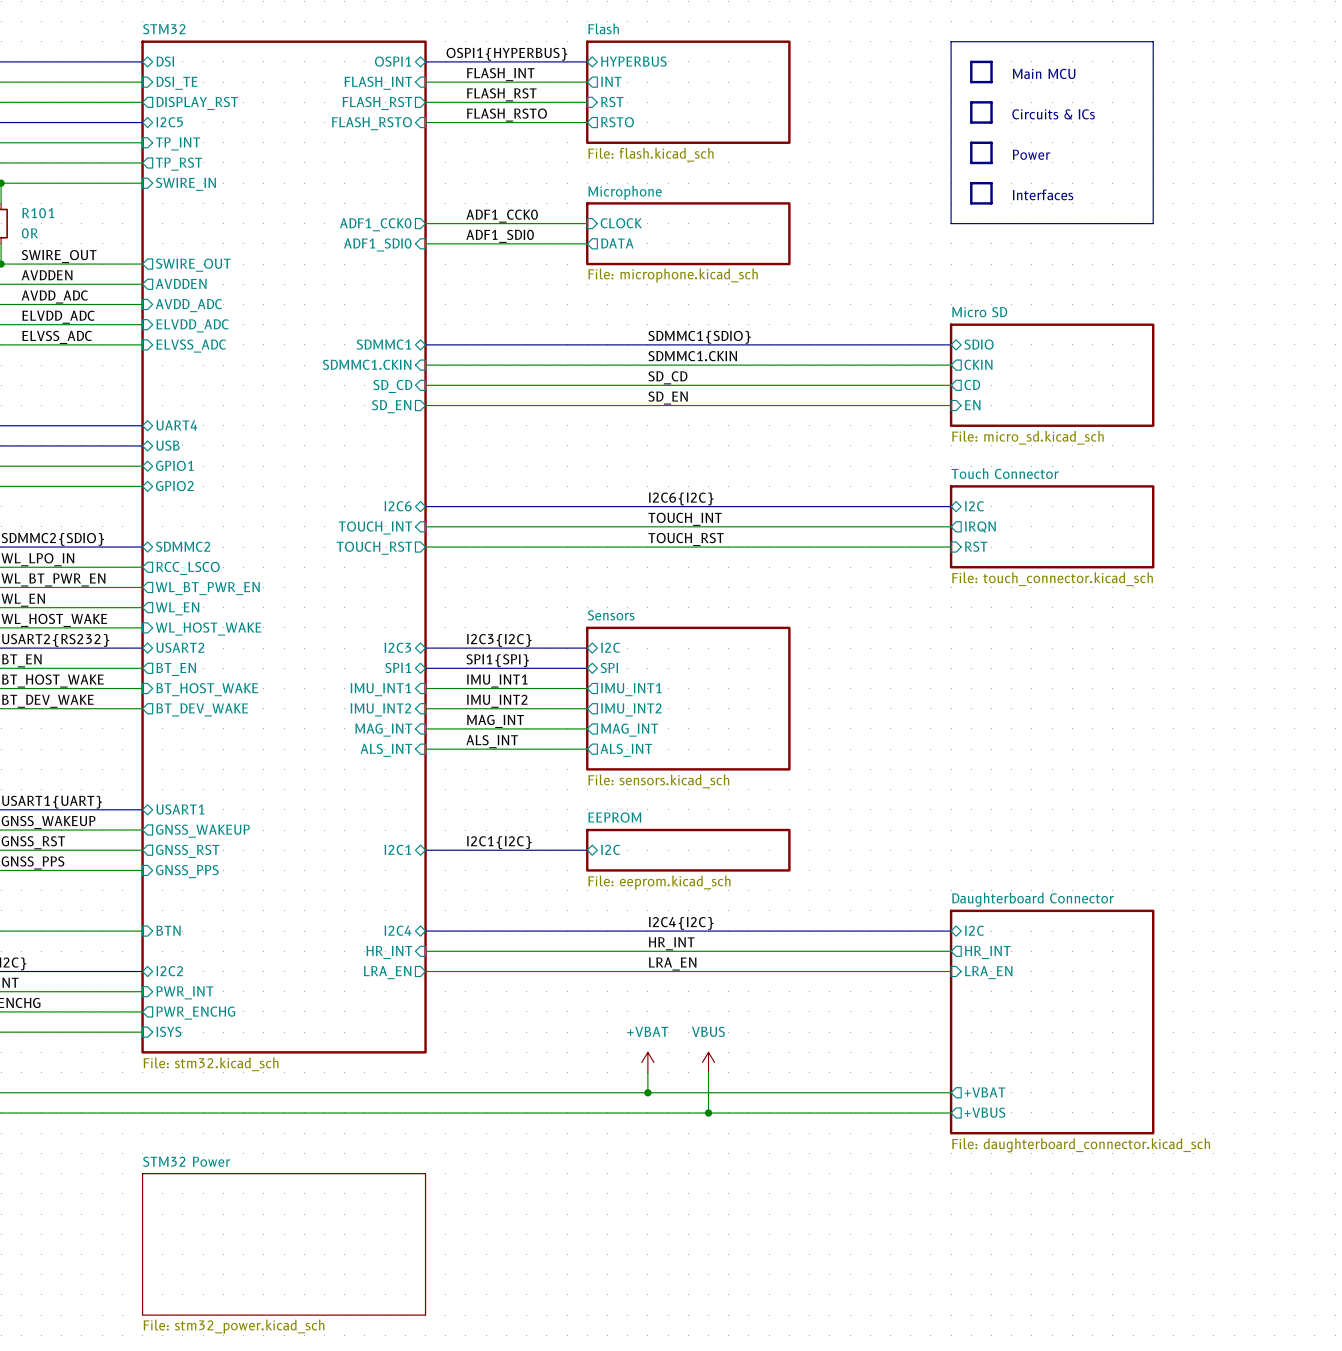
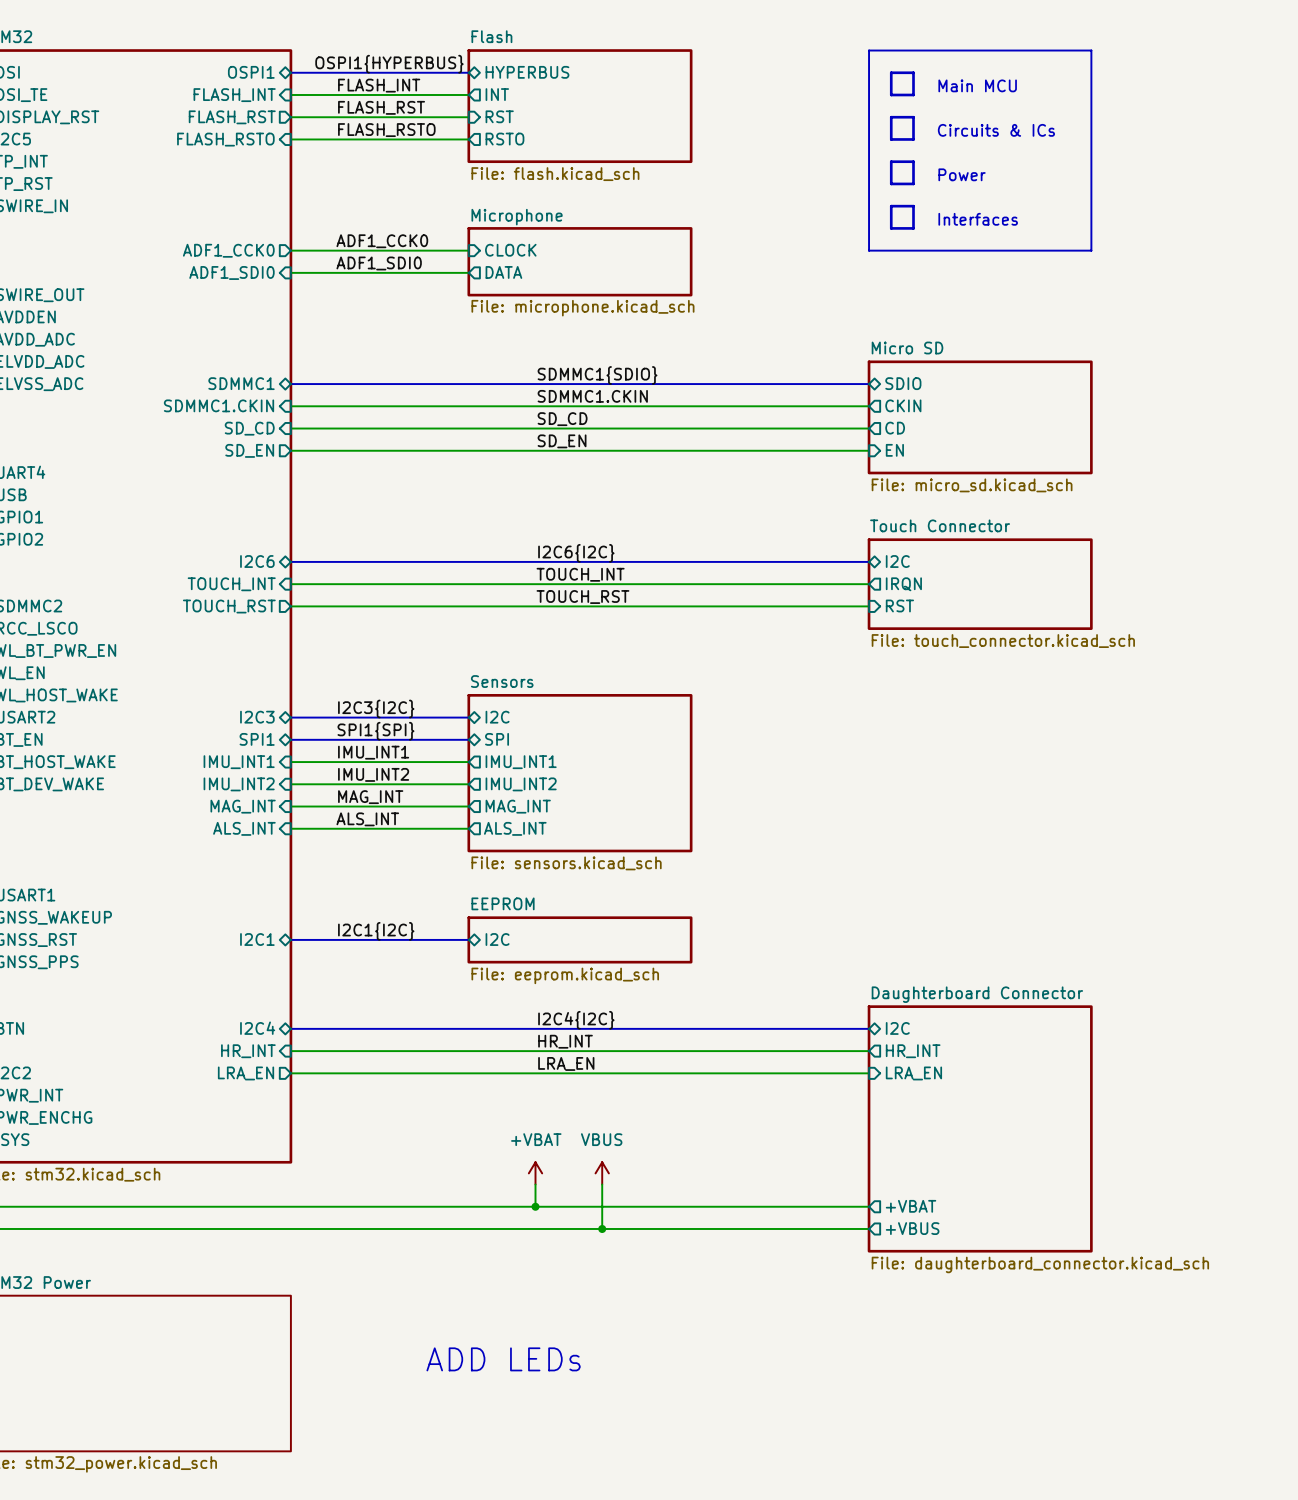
text: none -> ADD LEDs (503, 1359)

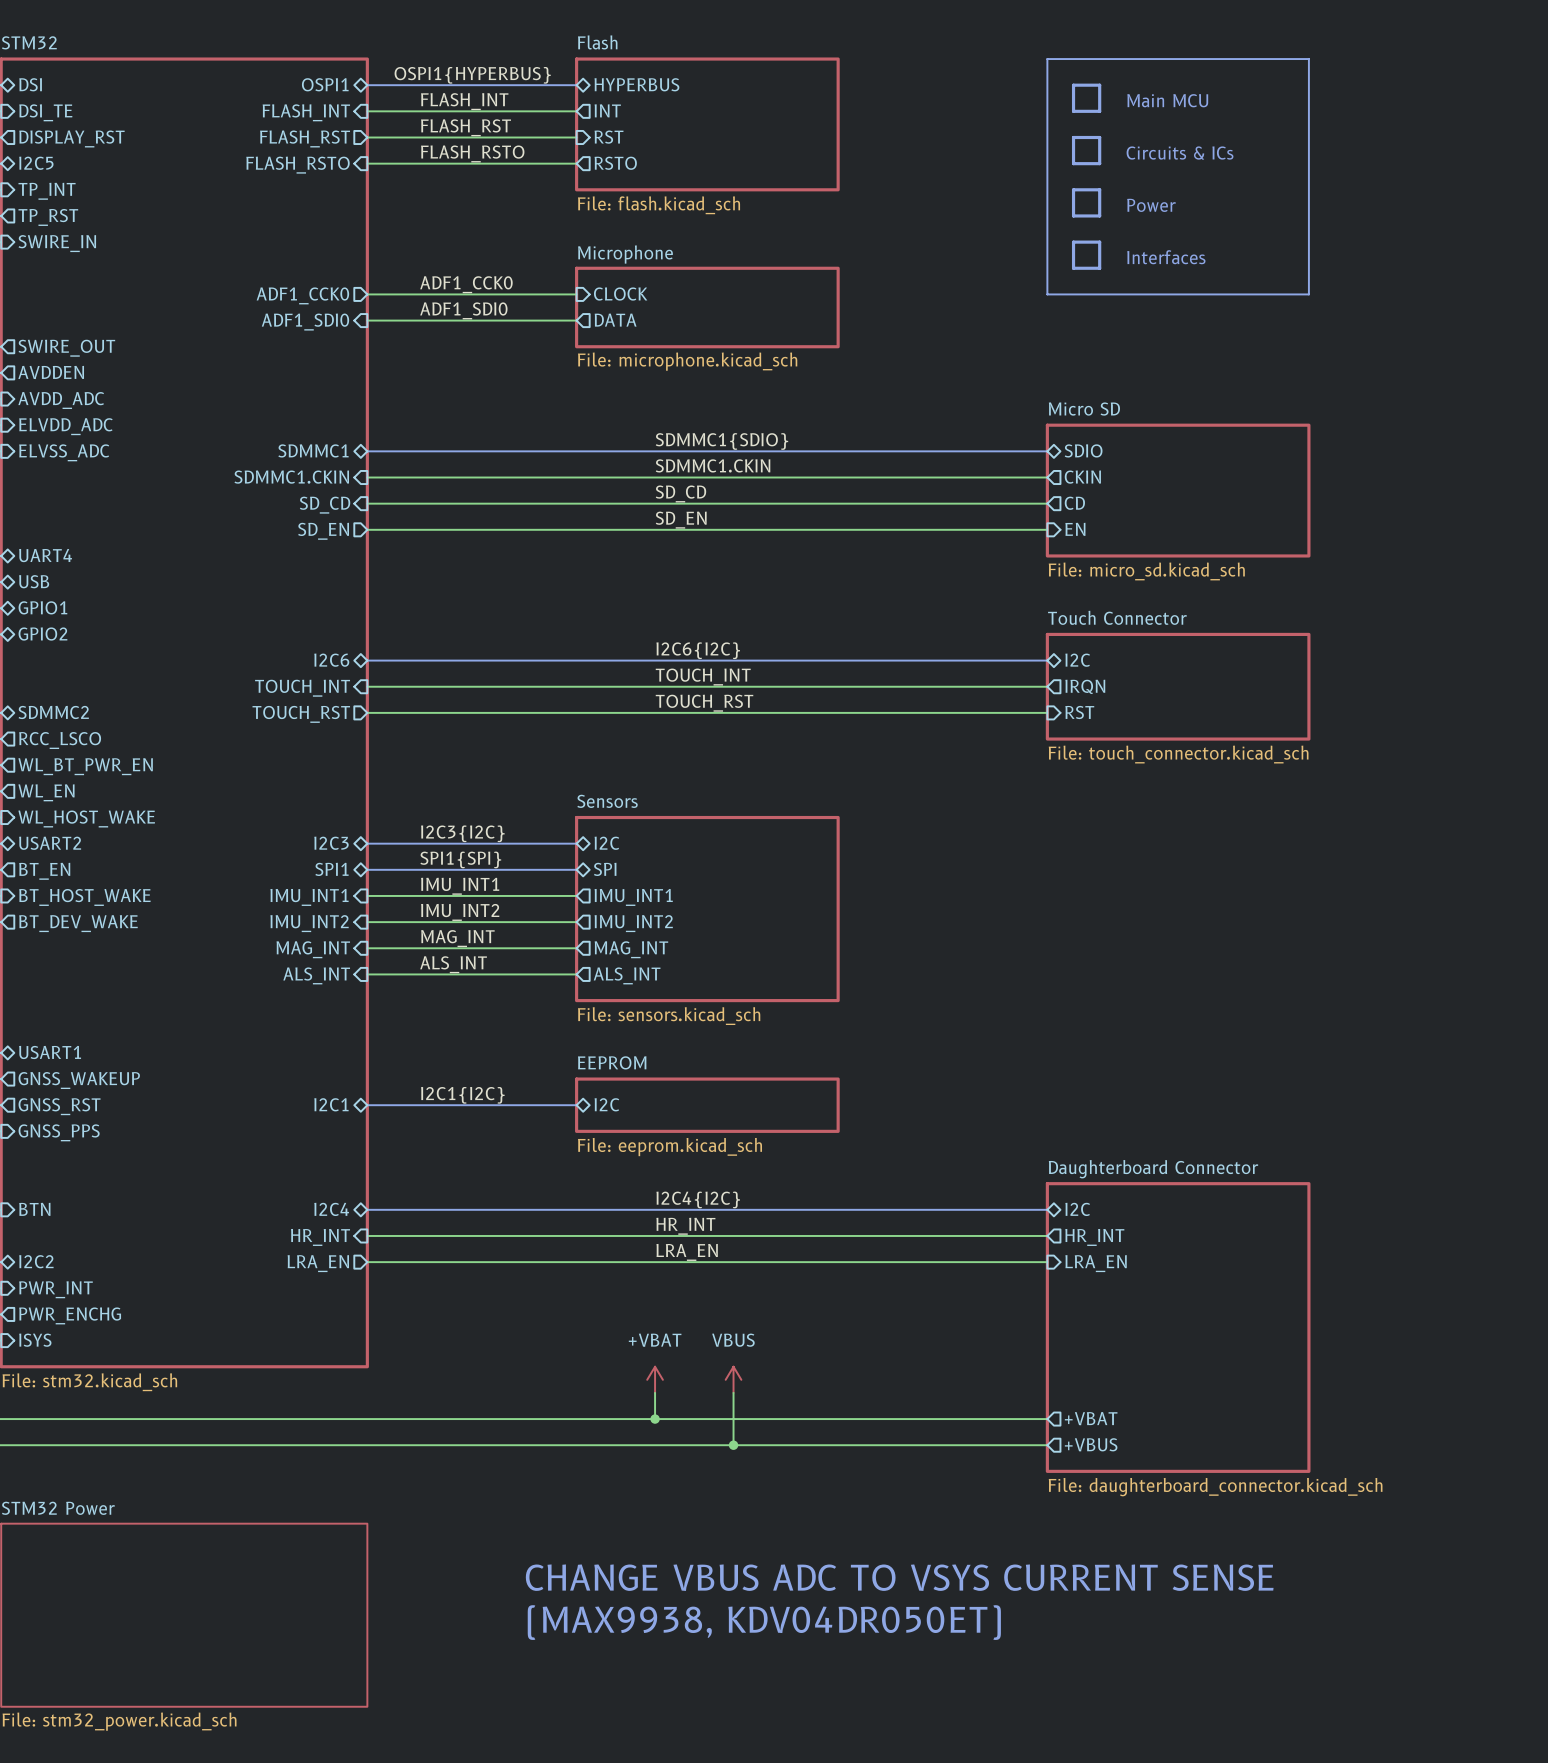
text: none -> CHANGE VBUS ADC TO VSYS CURRENT SENSE (899, 1577)
text: ADD LEDs (503, 1359) -> none
text: none -> (MAX9938, KDV04DR050ET) (764, 1622)

